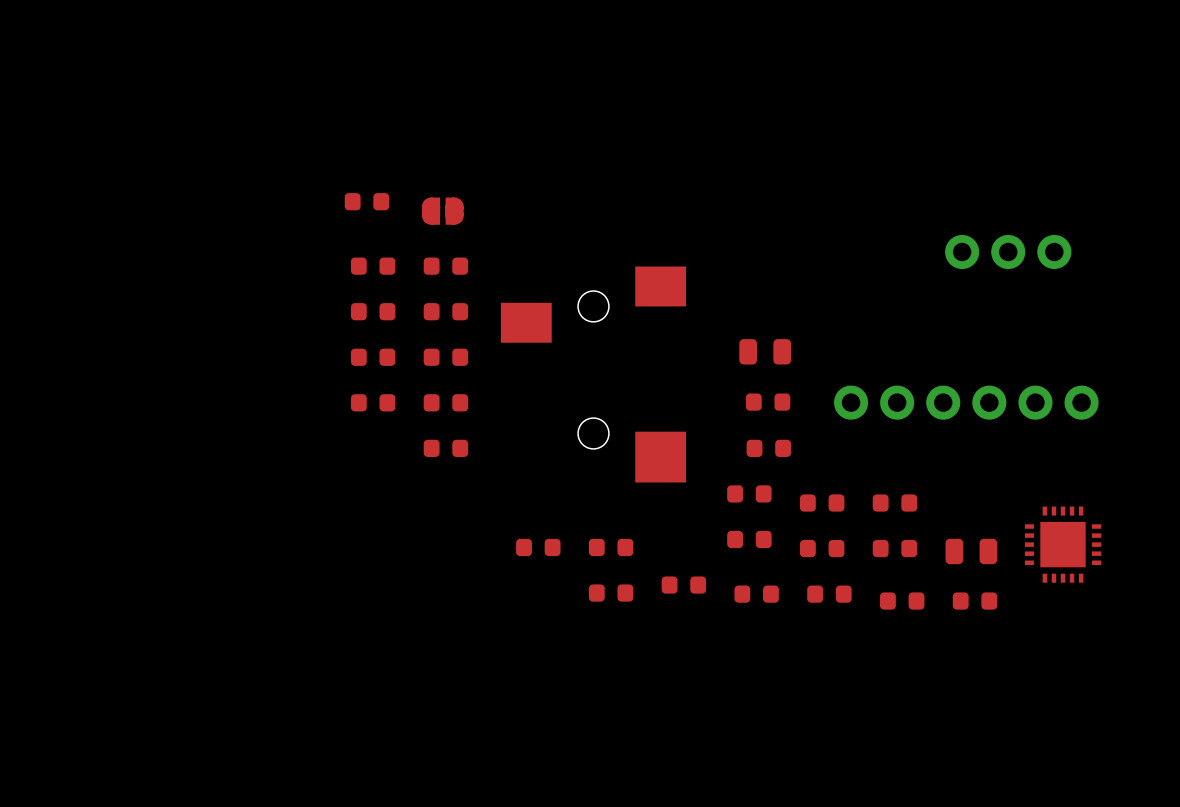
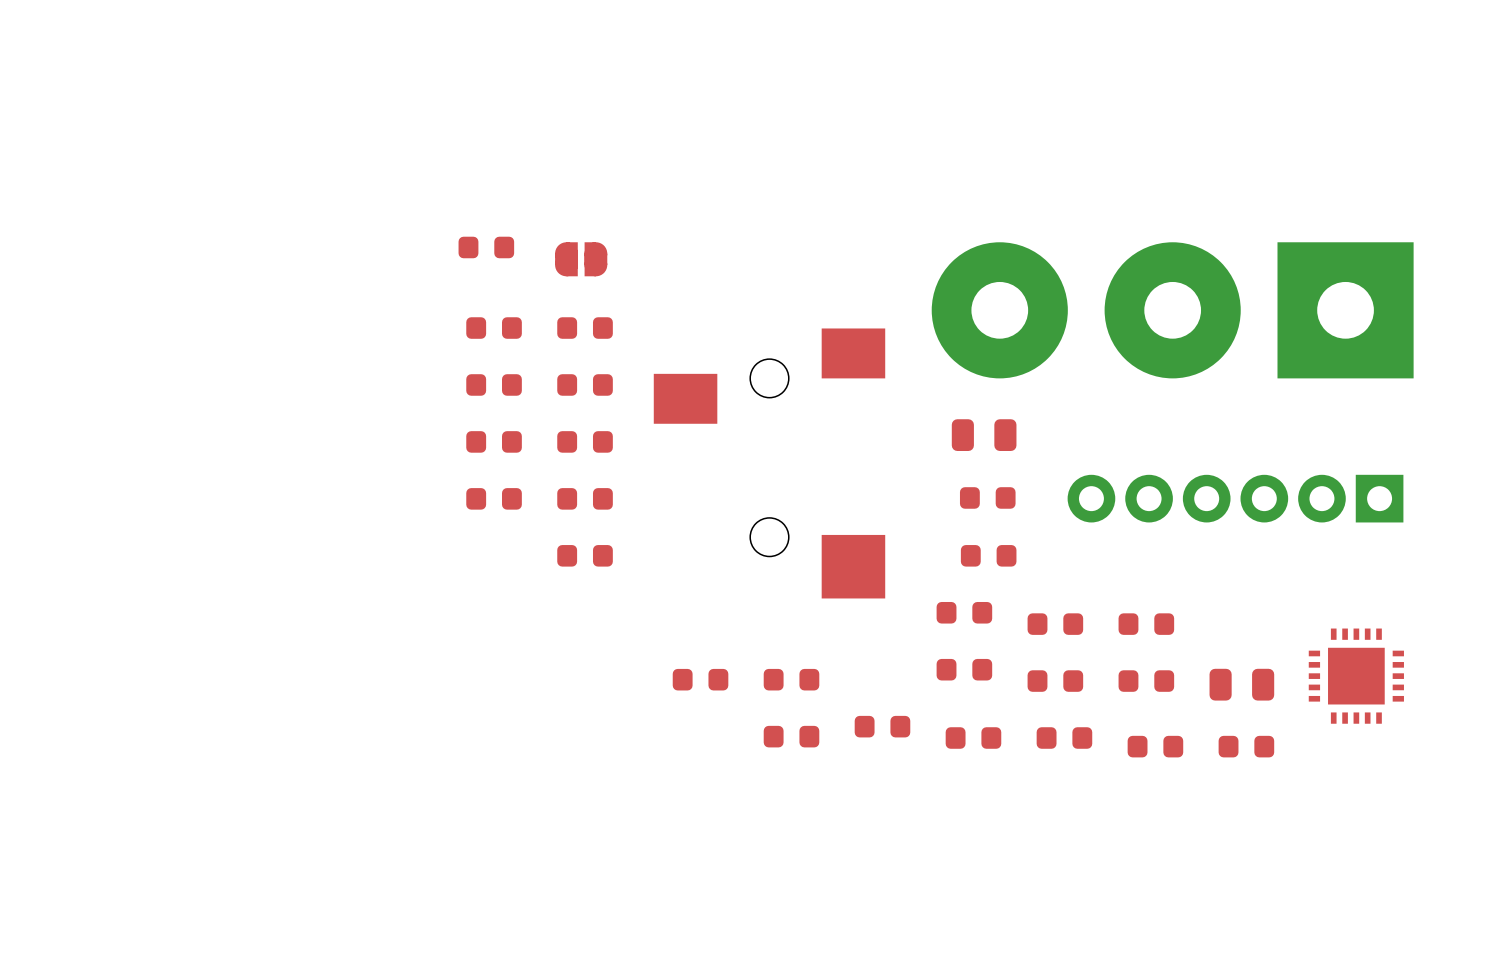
part: none -> (1172, 310)
part: (1008, 251) -> none
part footprint: [833, 385, 1099, 420] -> [1067, 474, 1404, 523]

